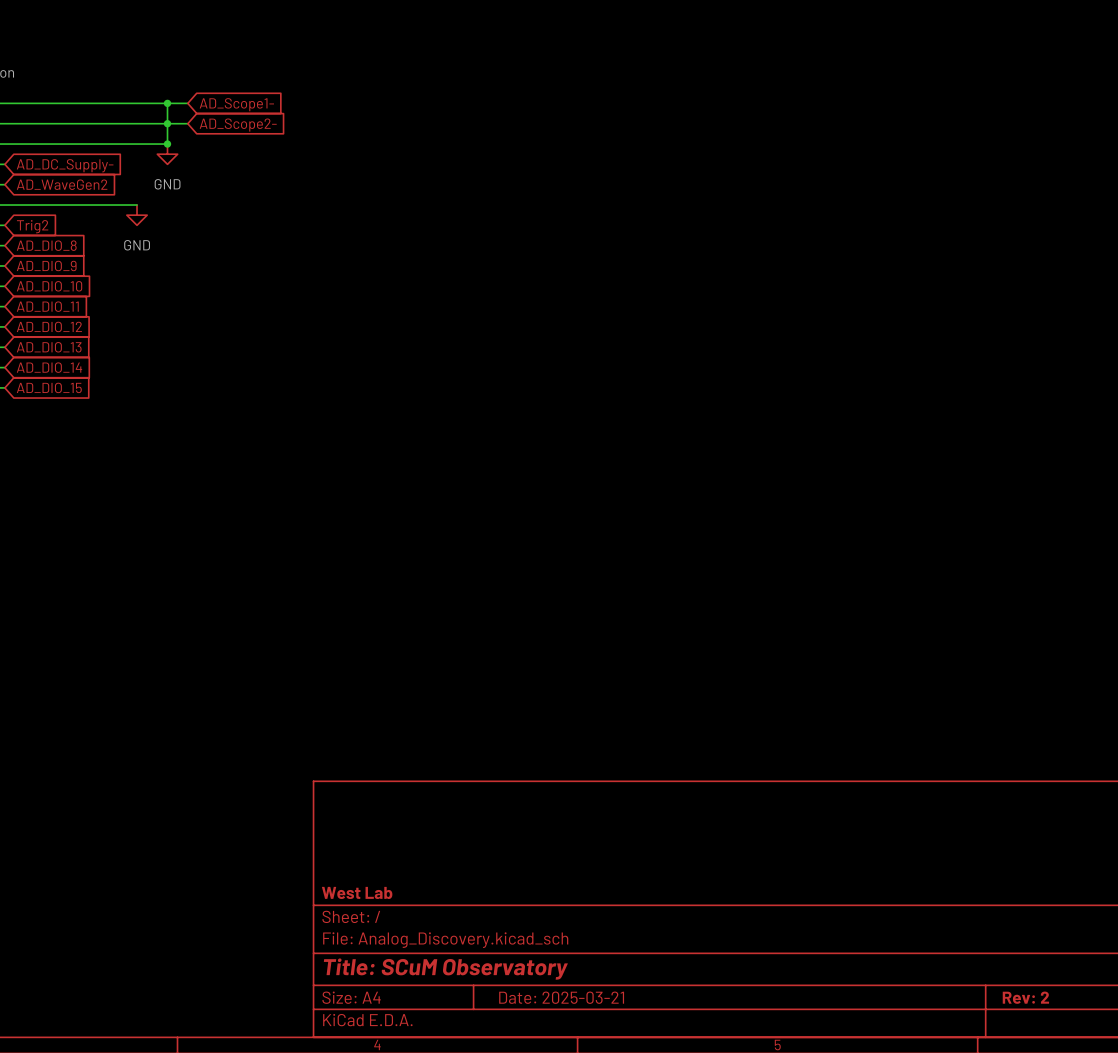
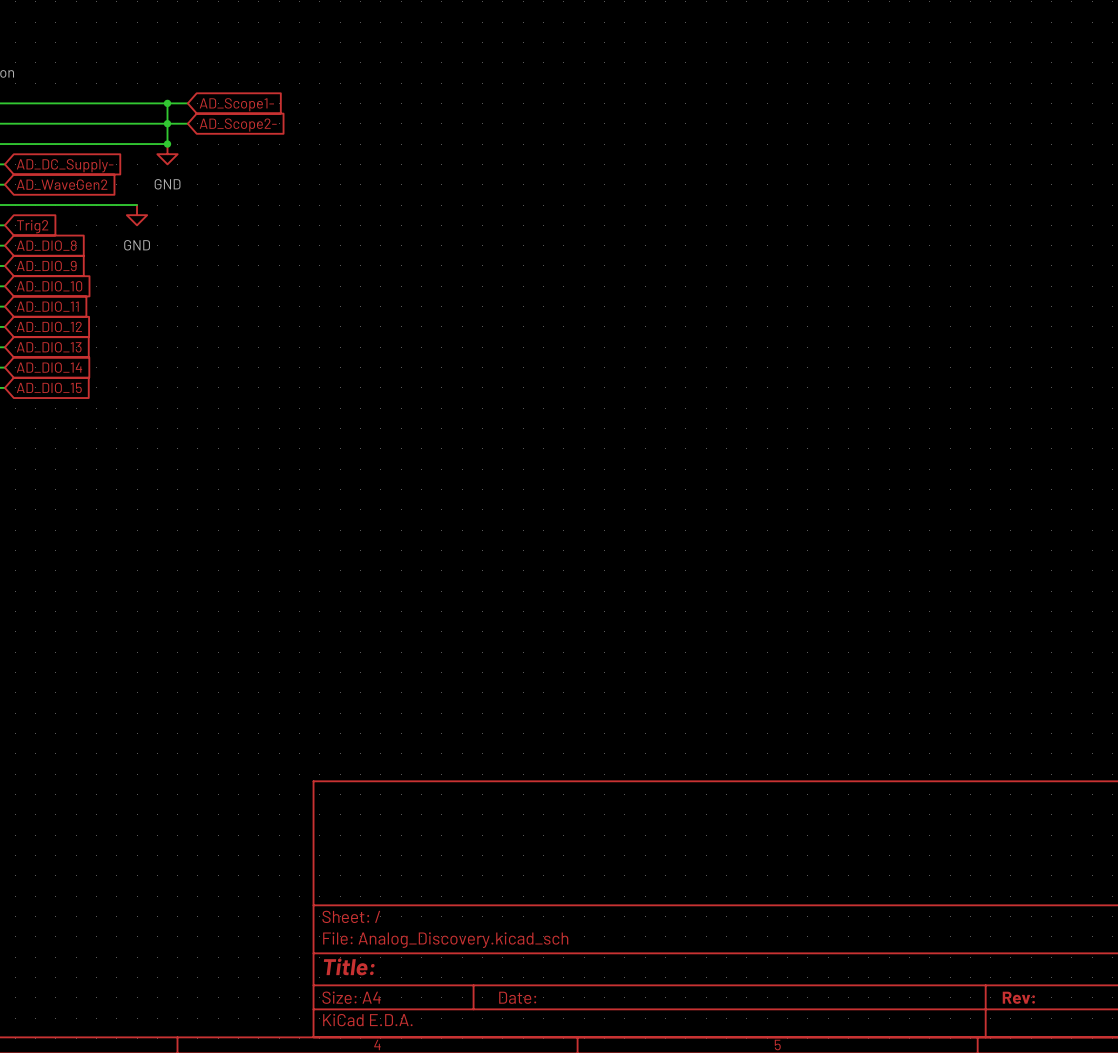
title block: West Lab (357, 892) -> none
title block: Title: SCuM Observatory (445, 969) -> Title: (349, 966)
title block: Date: 2025-03-21 (561, 997) -> Date: (517, 997)
title block: Rev: 2 (1025, 997) -> Rev: (1018, 997)

